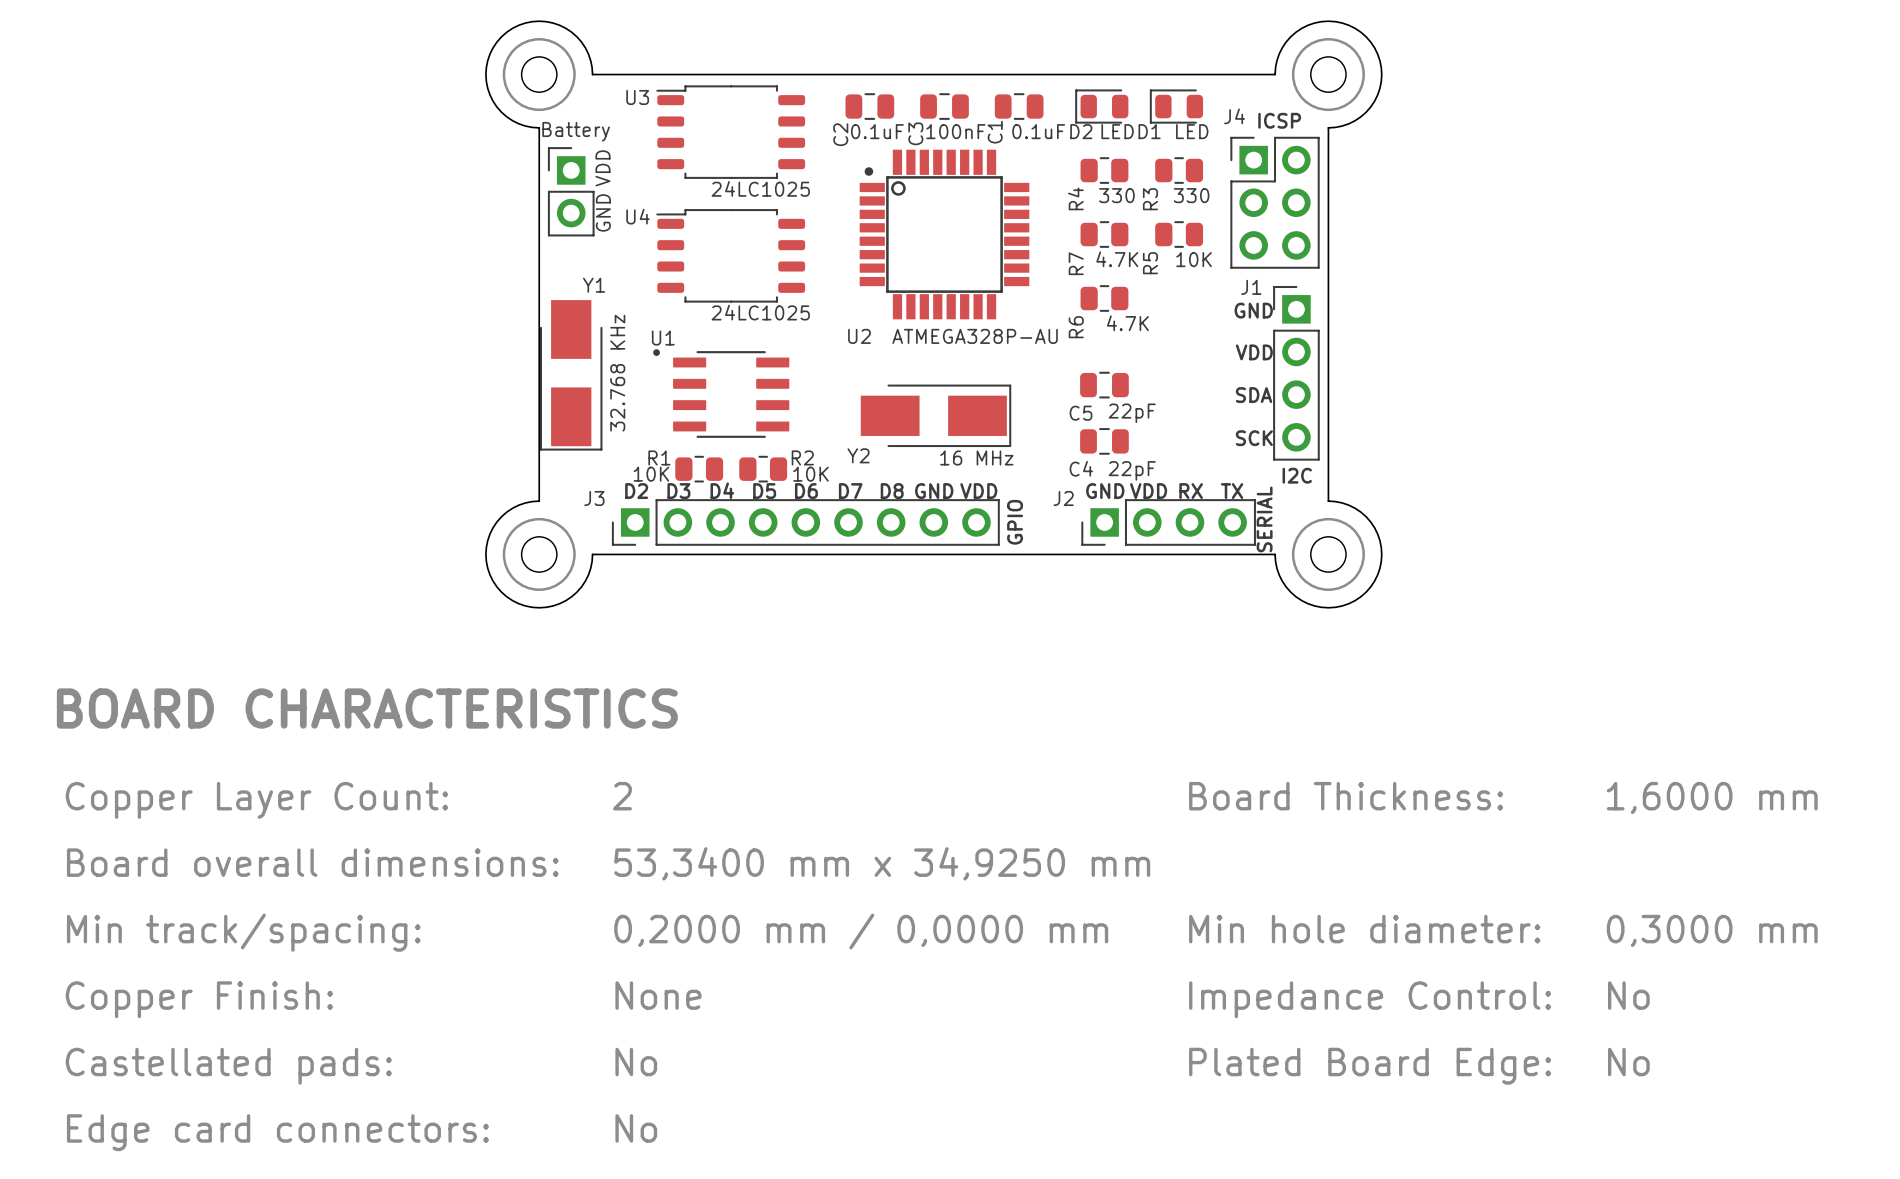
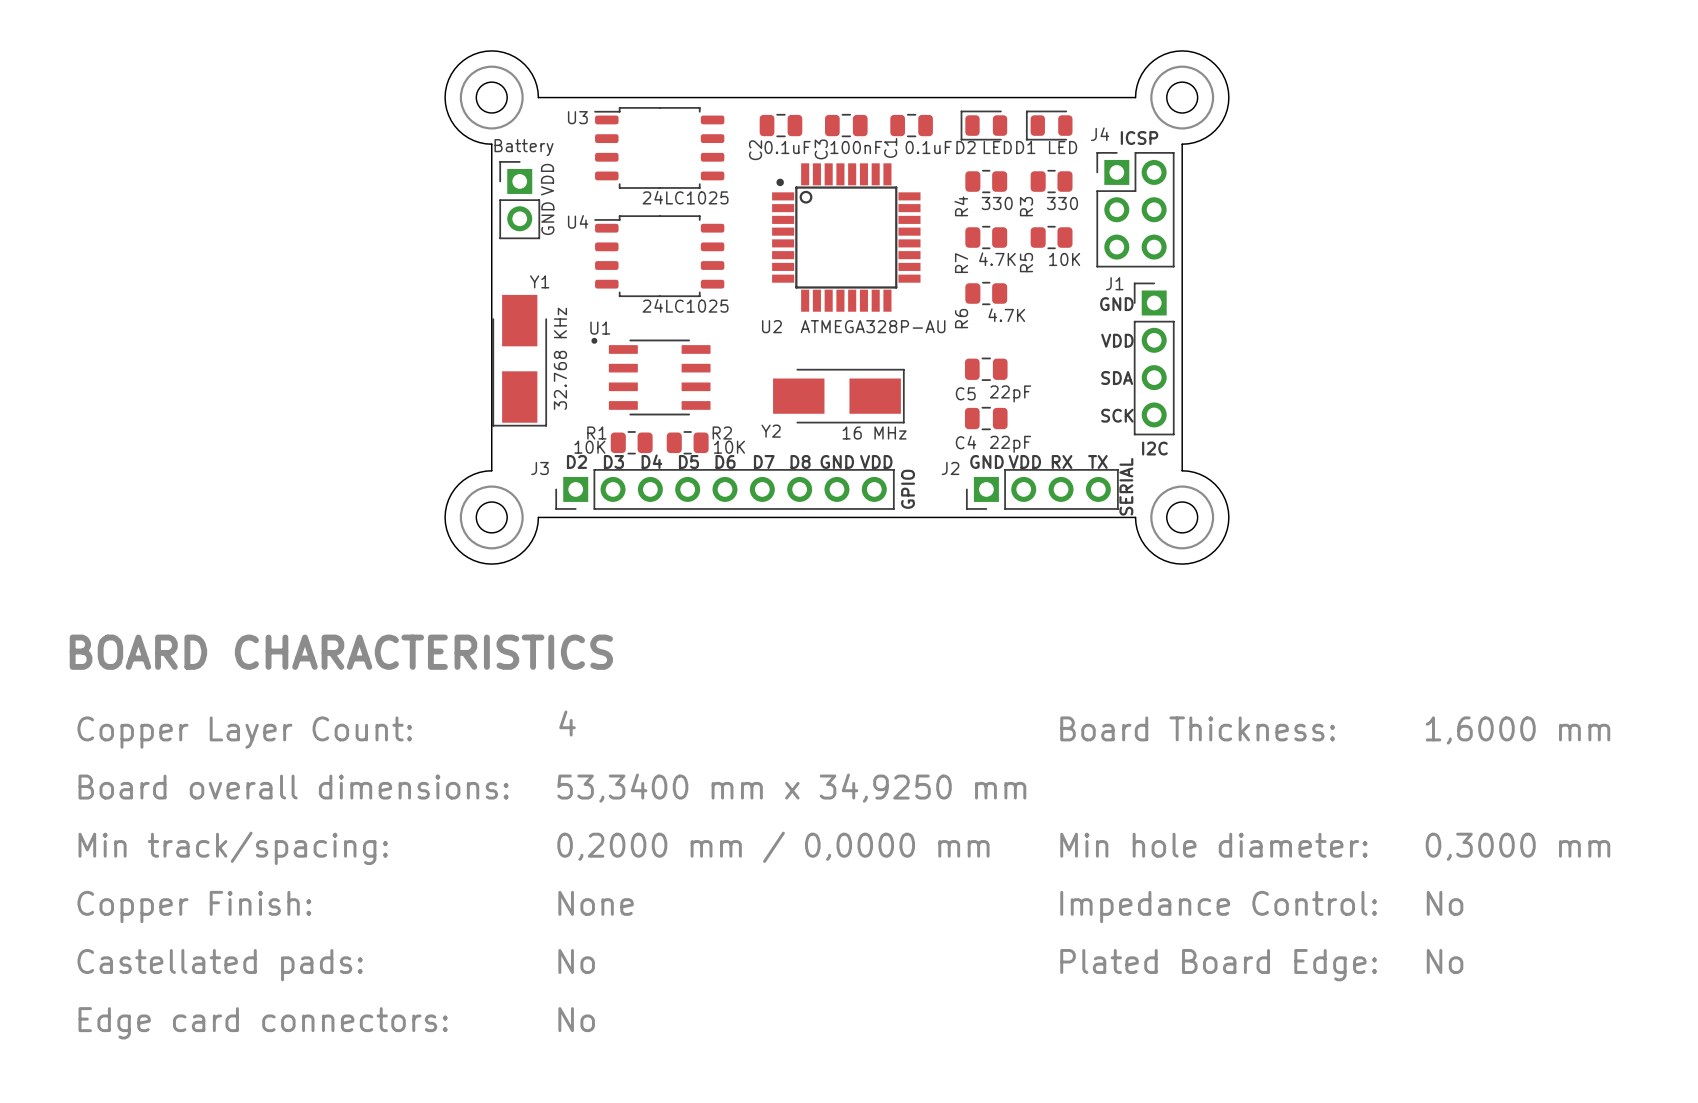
text: 2 (622, 796) -> 4 (567, 723)

